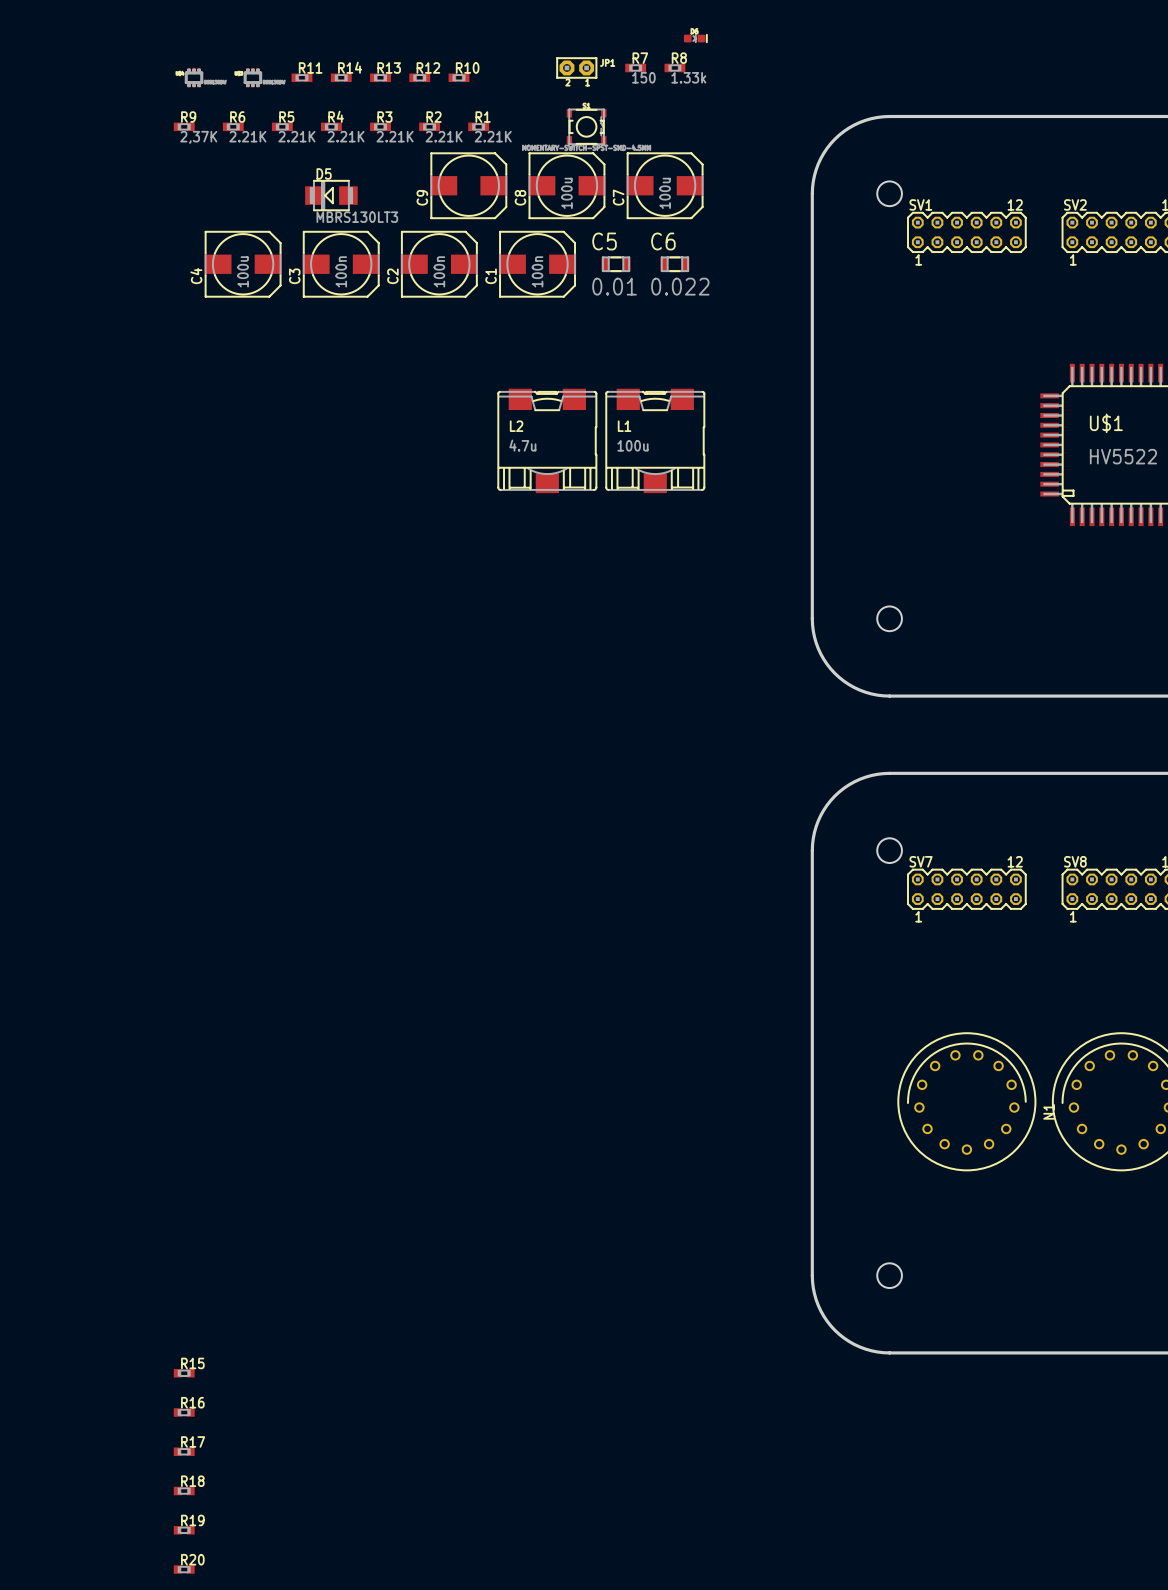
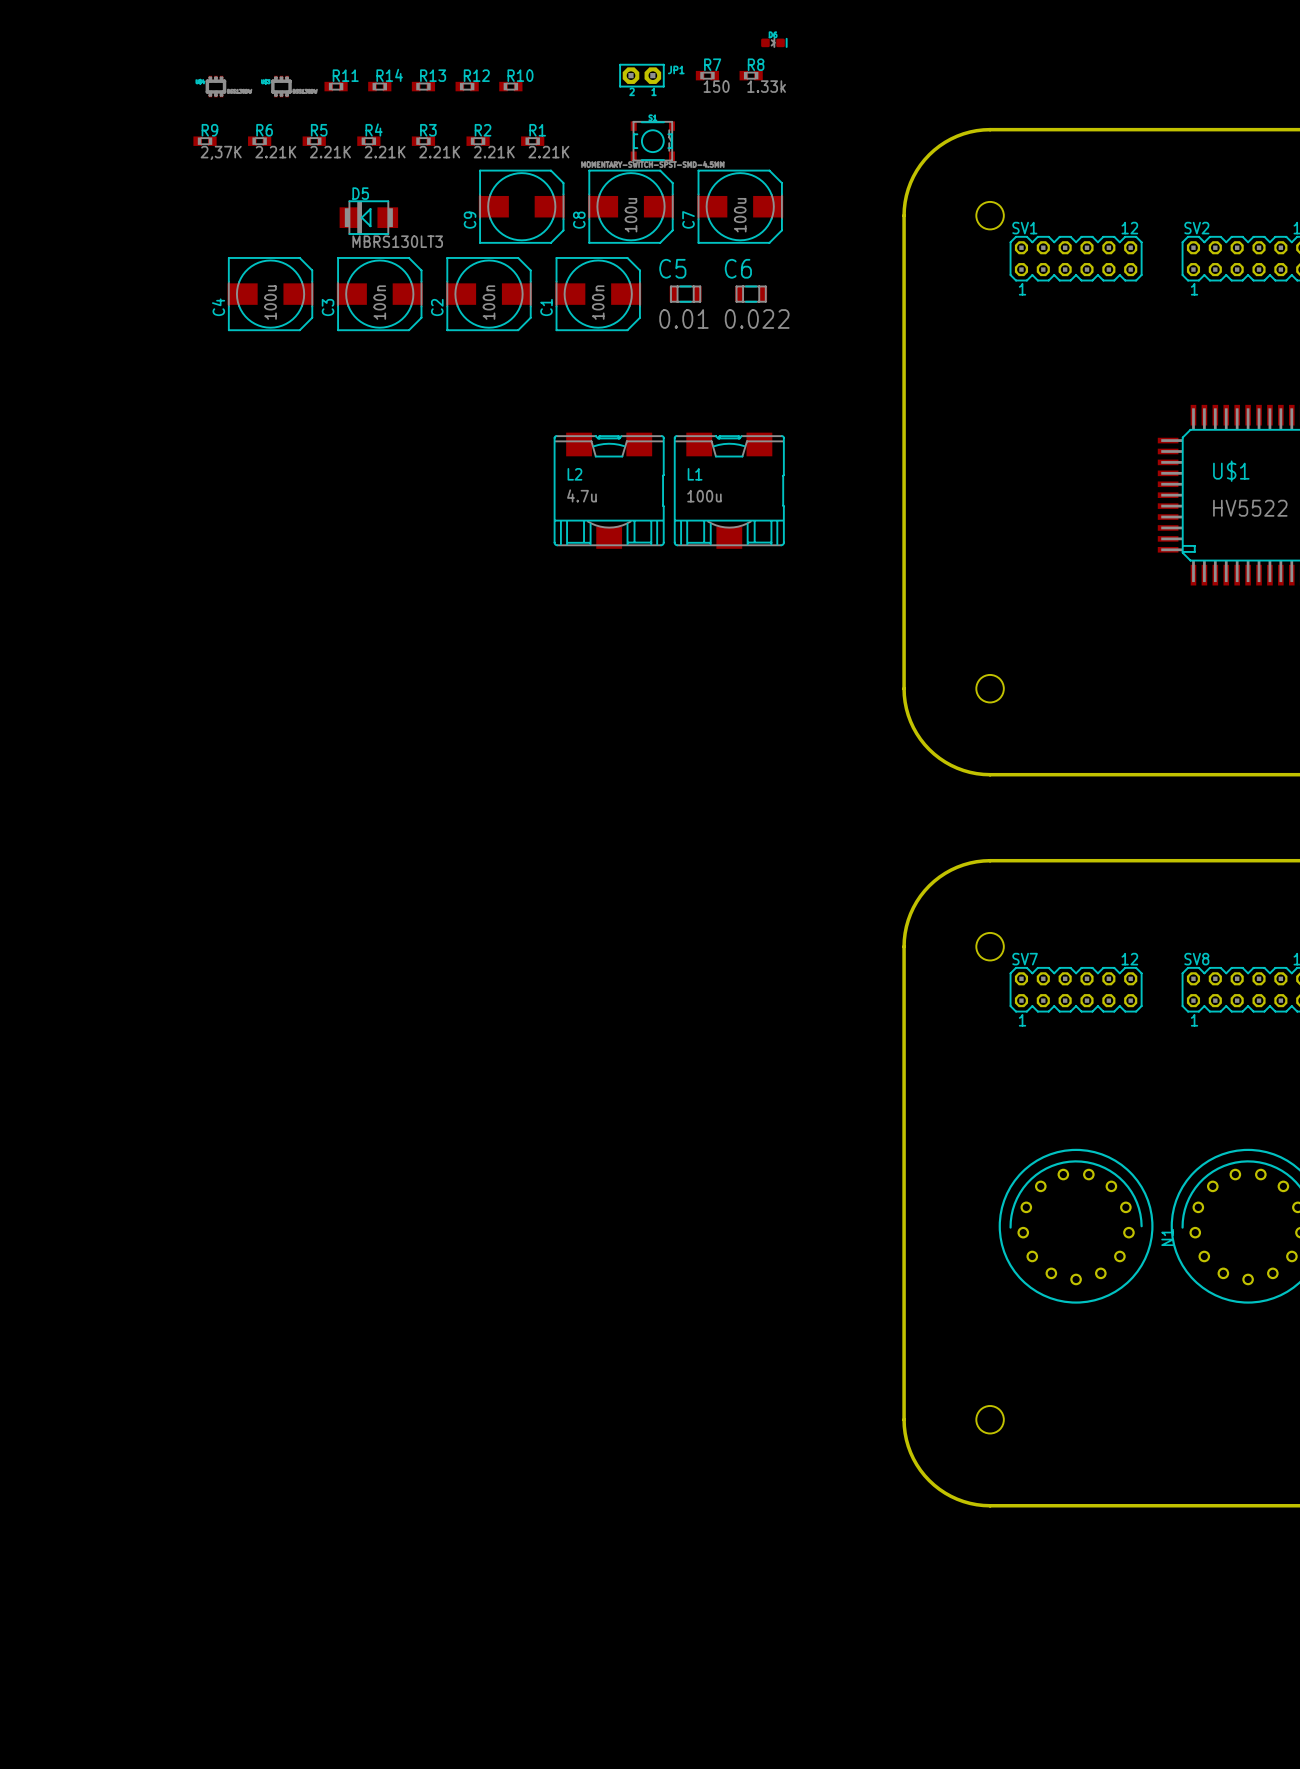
R15: (184, 1373) -> none
R16: (184, 1412) -> none
R17: (184, 1451) -> none
R18: (184, 1491) -> none
R19: (184, 1530) -> none
R20: (184, 1569) -> none

